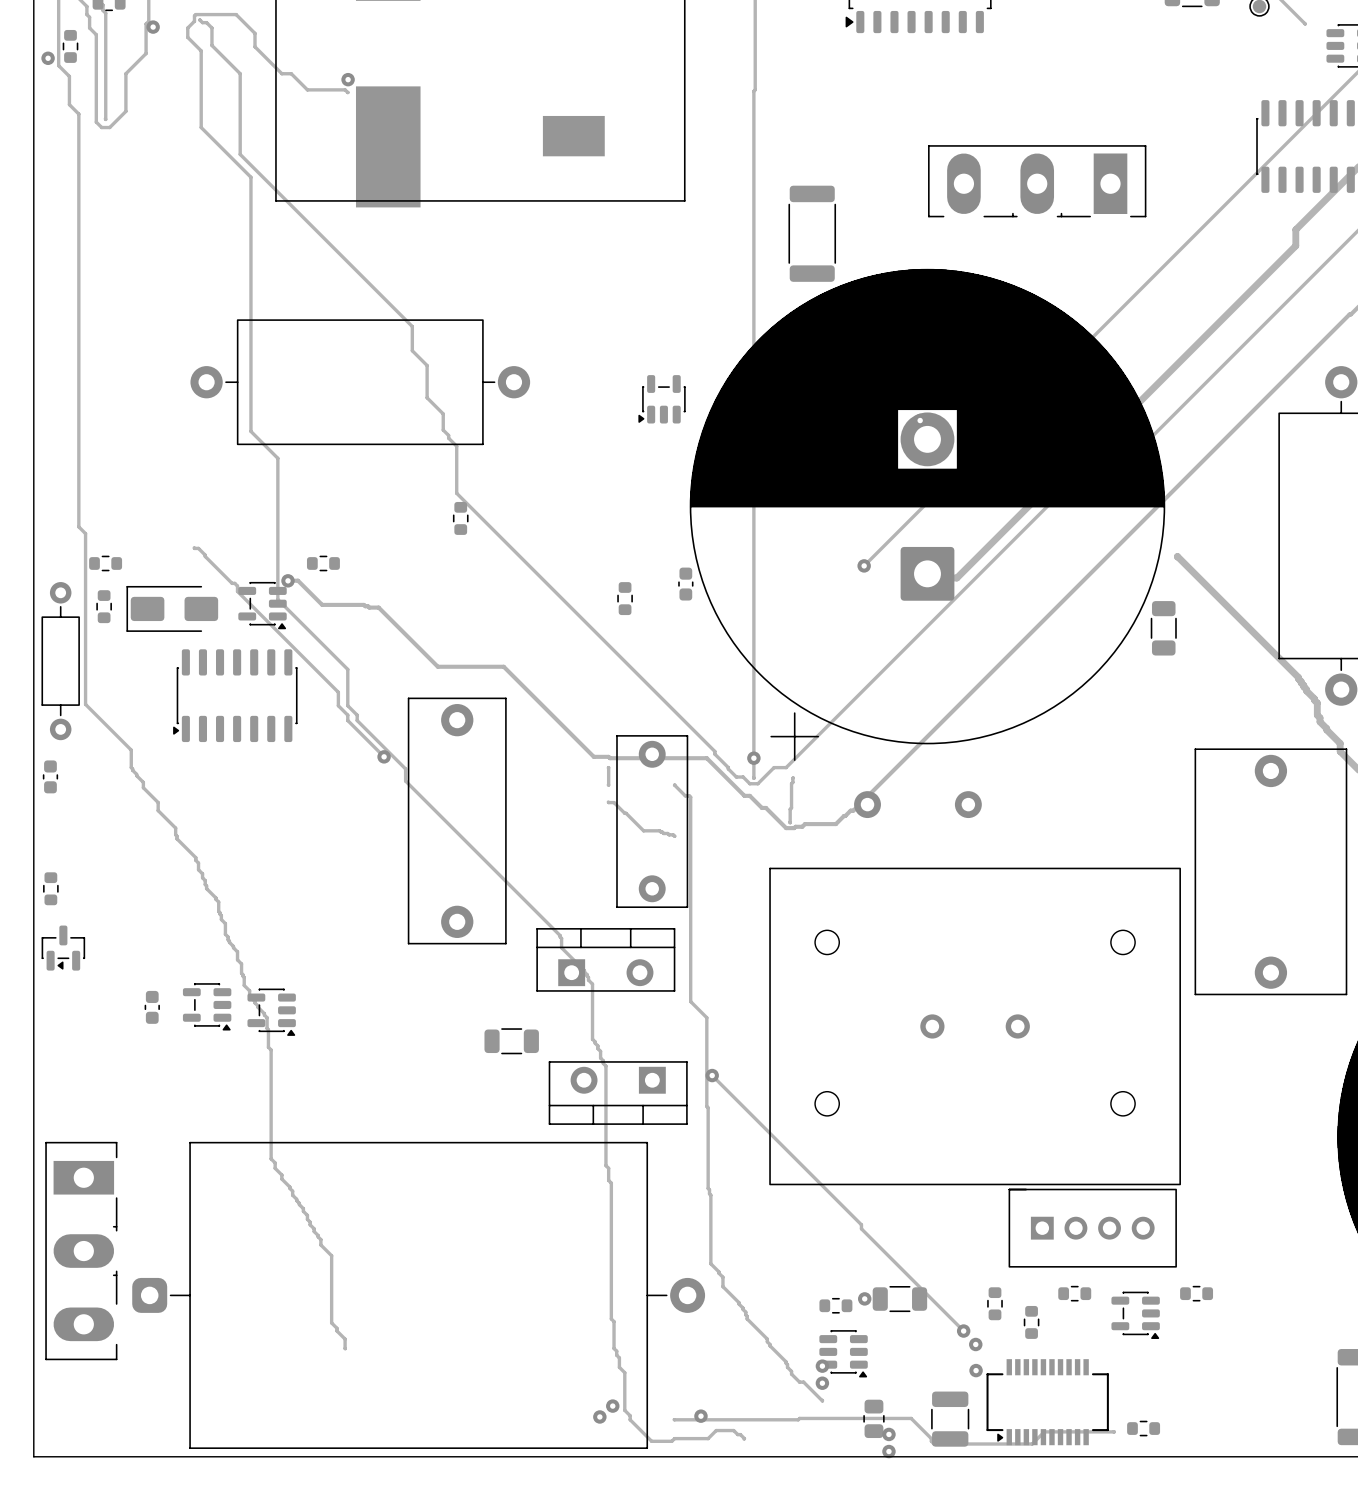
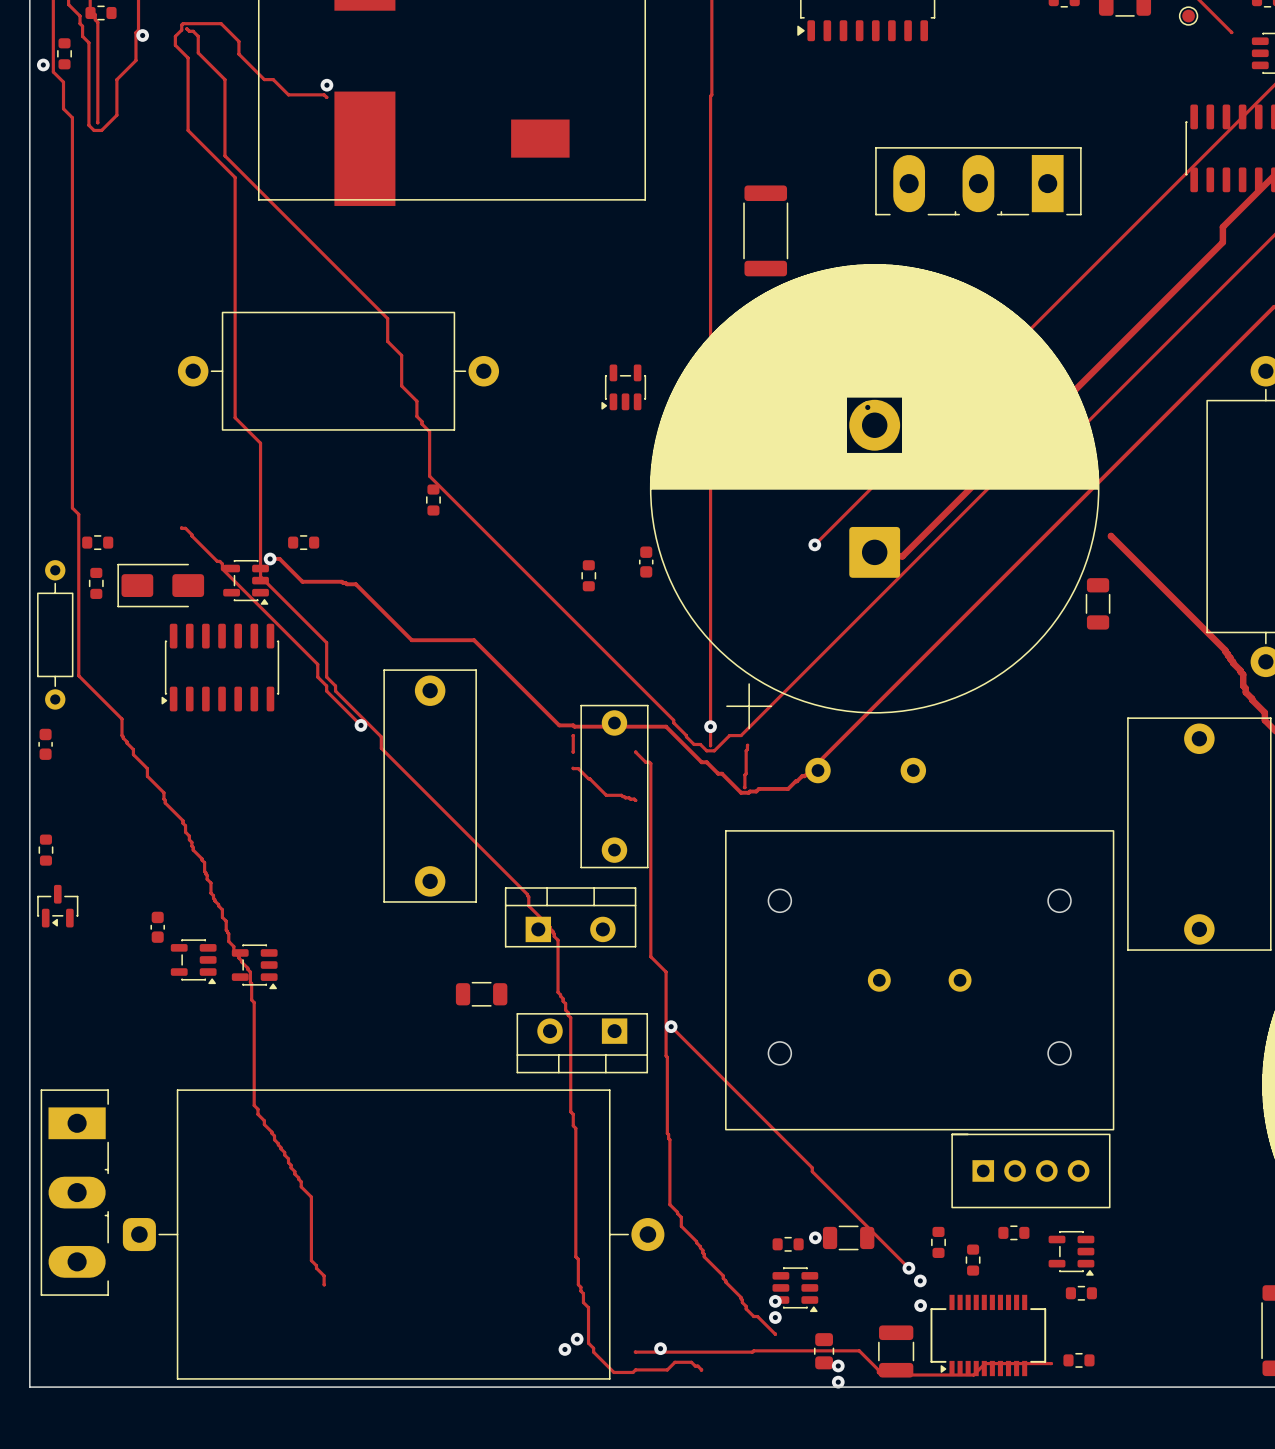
part position: (152, 1007) -> (157, 927)
part position: (1196, 1293) -> (1081, 1293)

